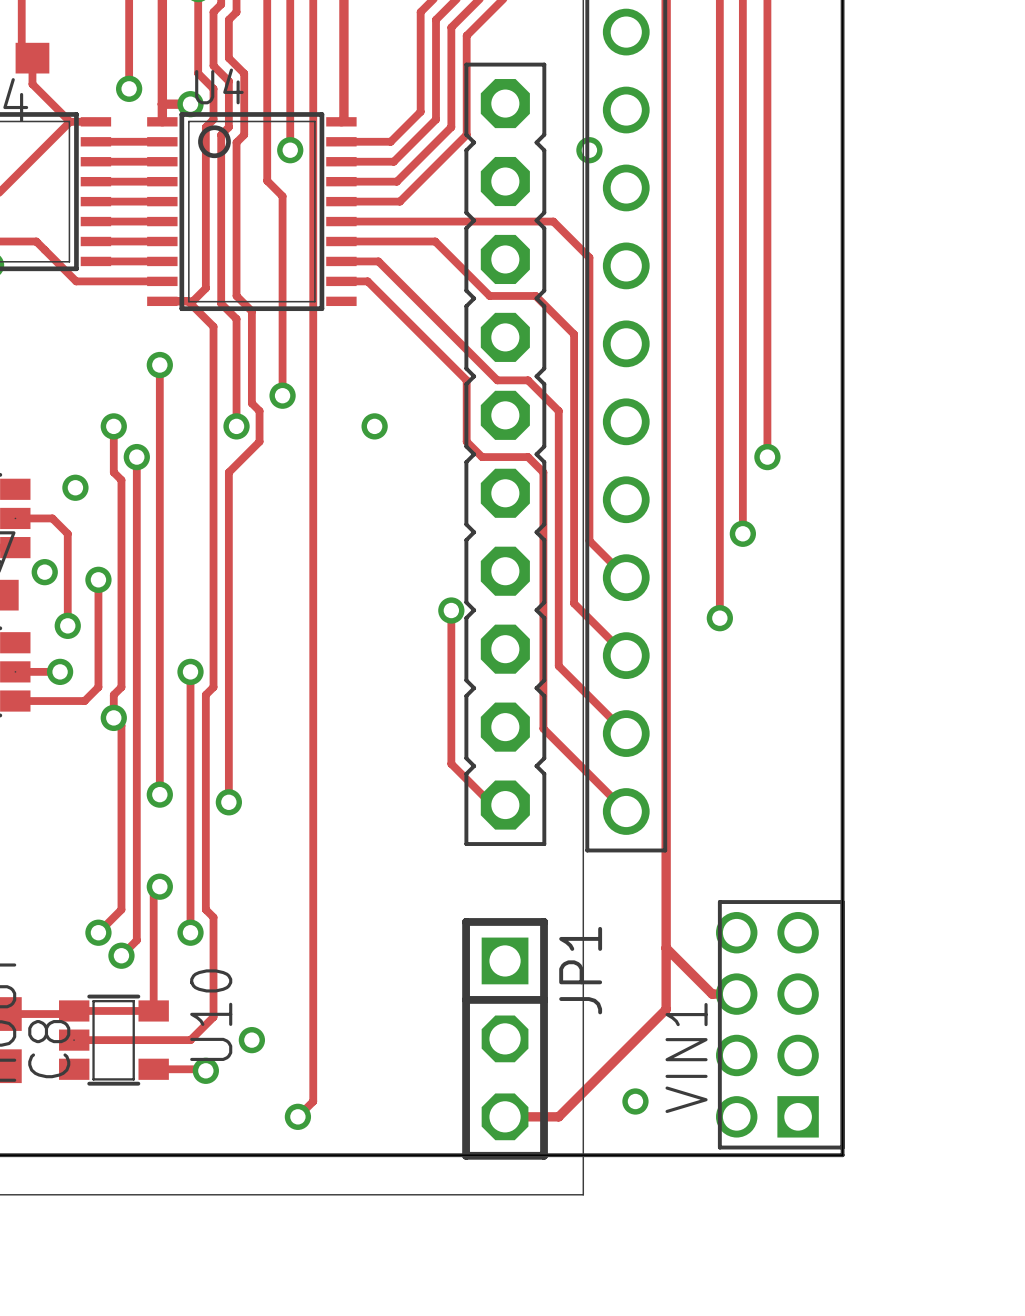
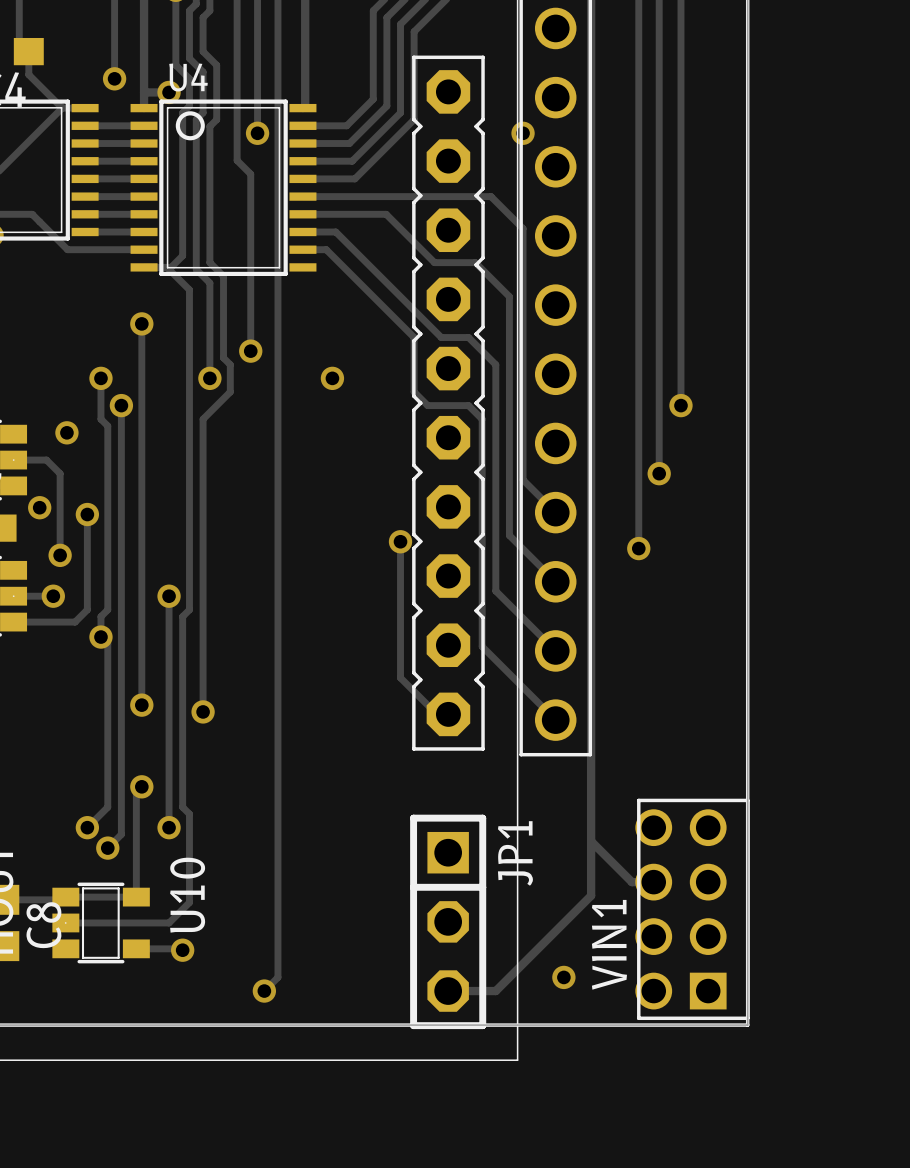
via: (251, 1040) -> none

